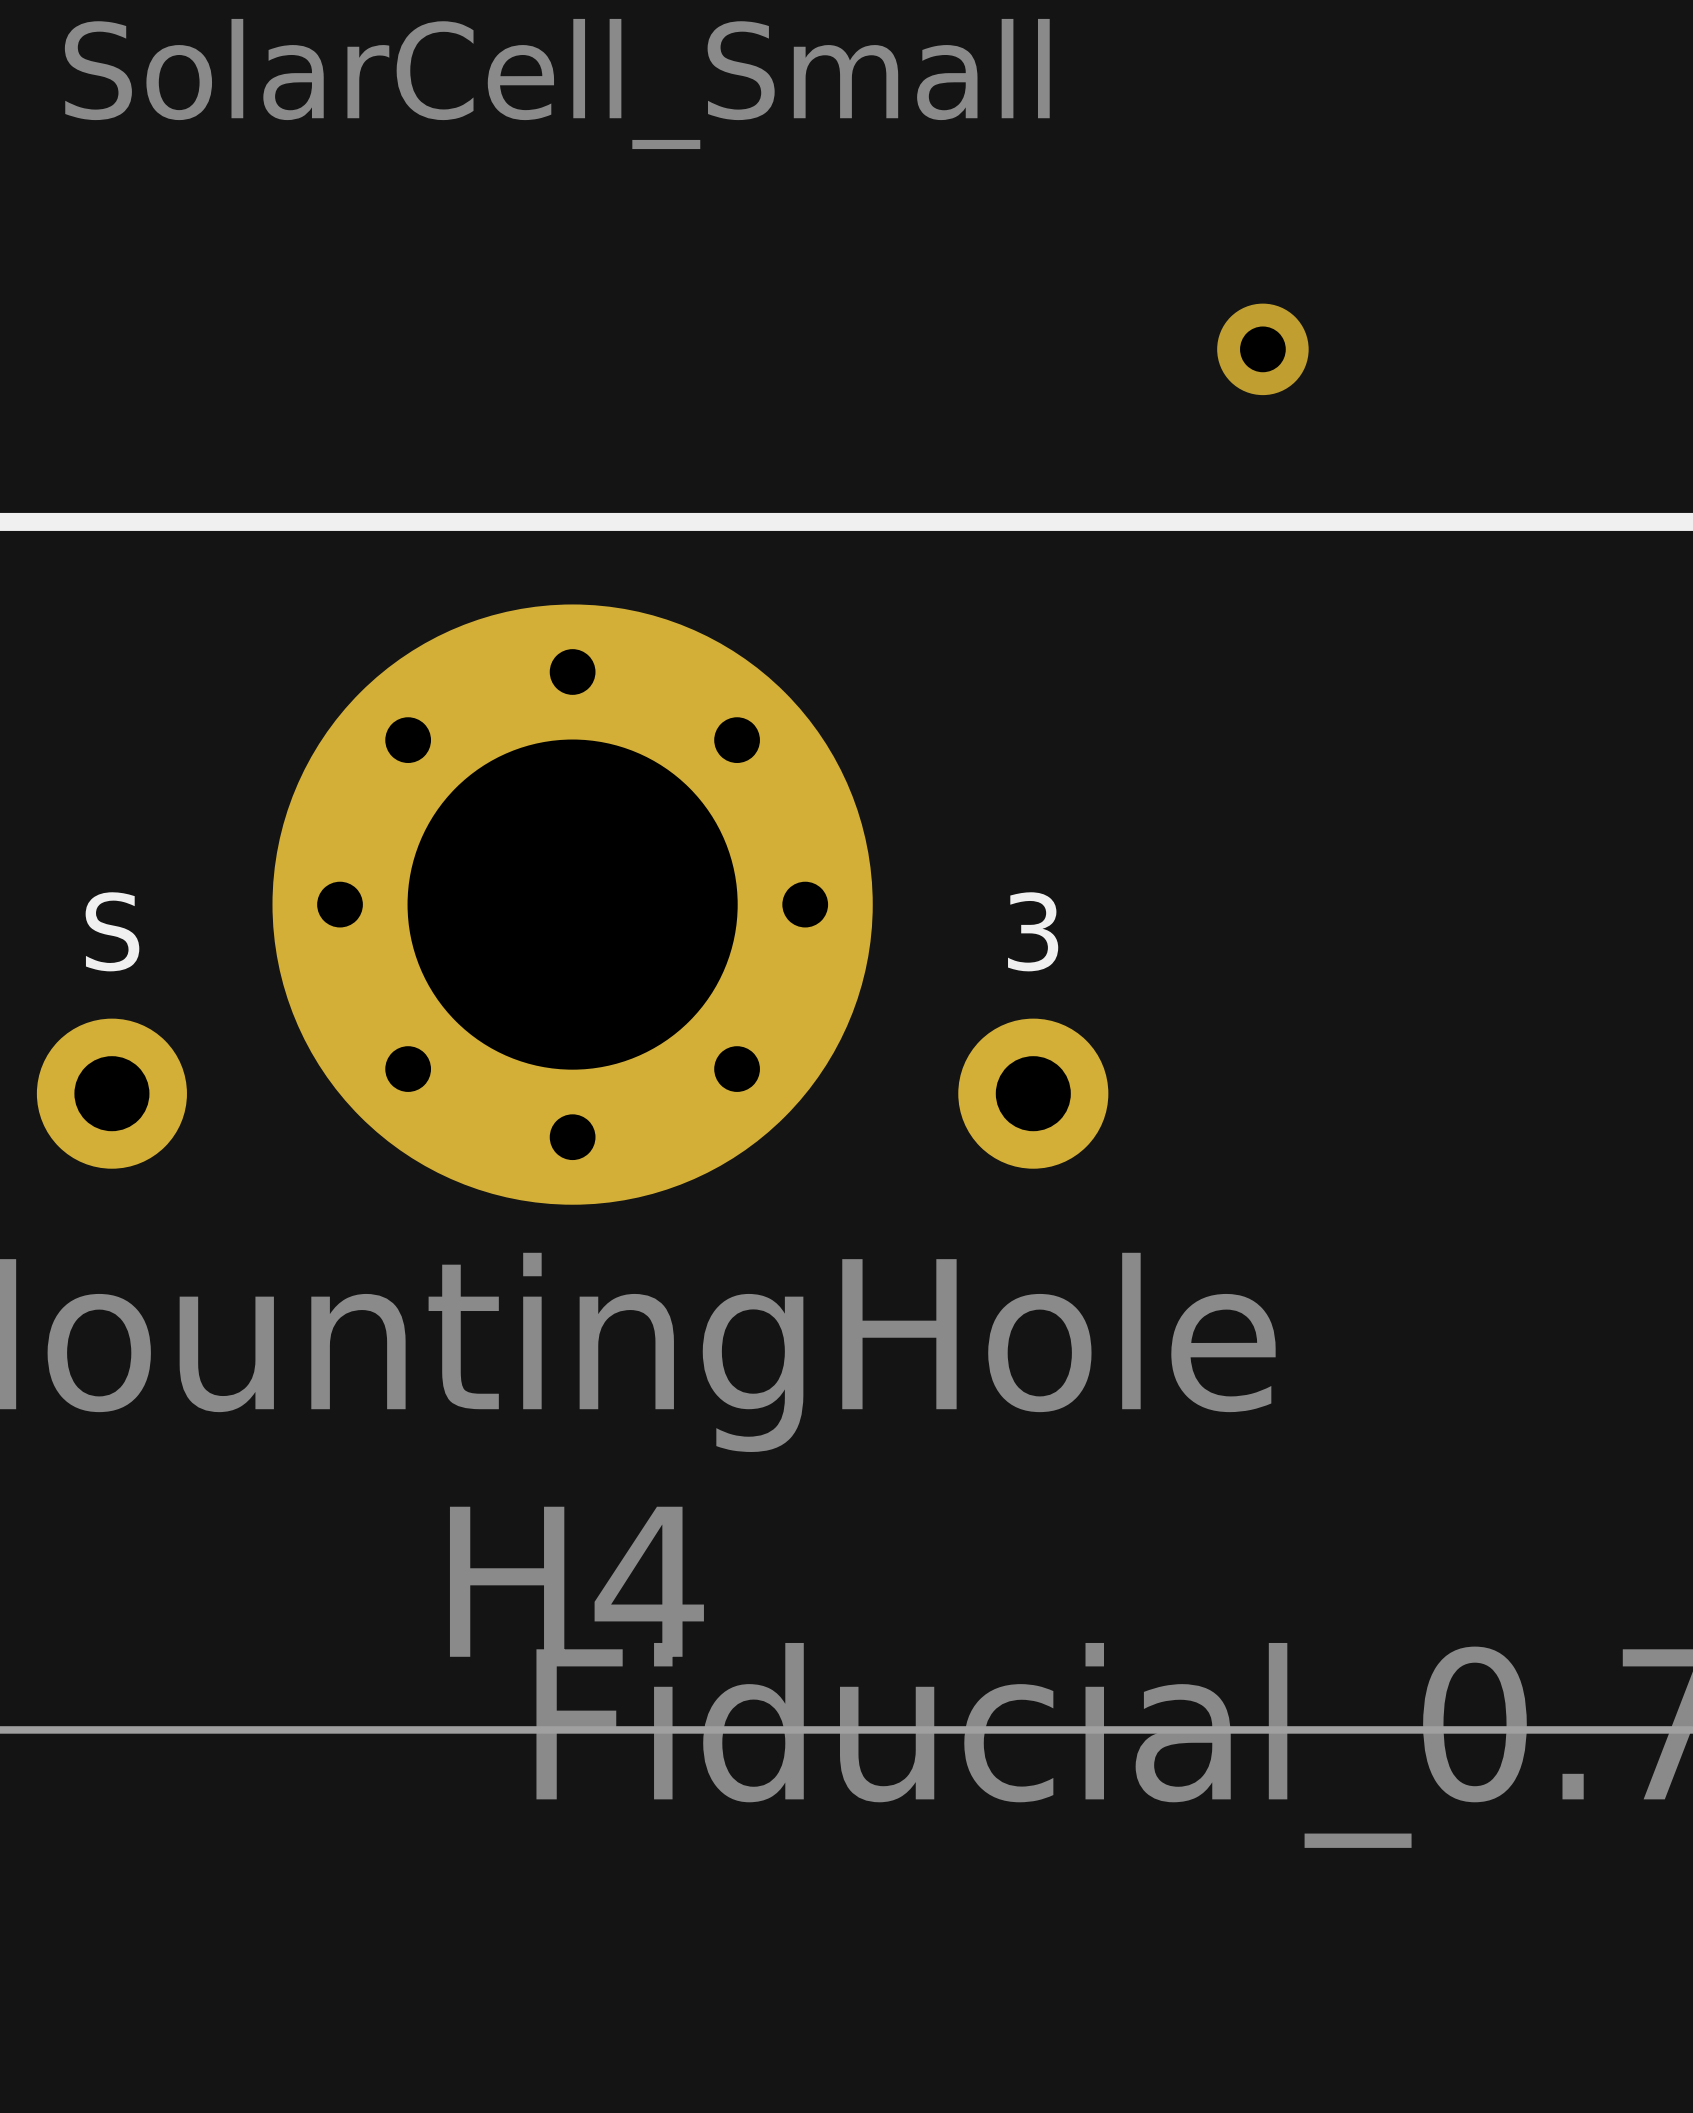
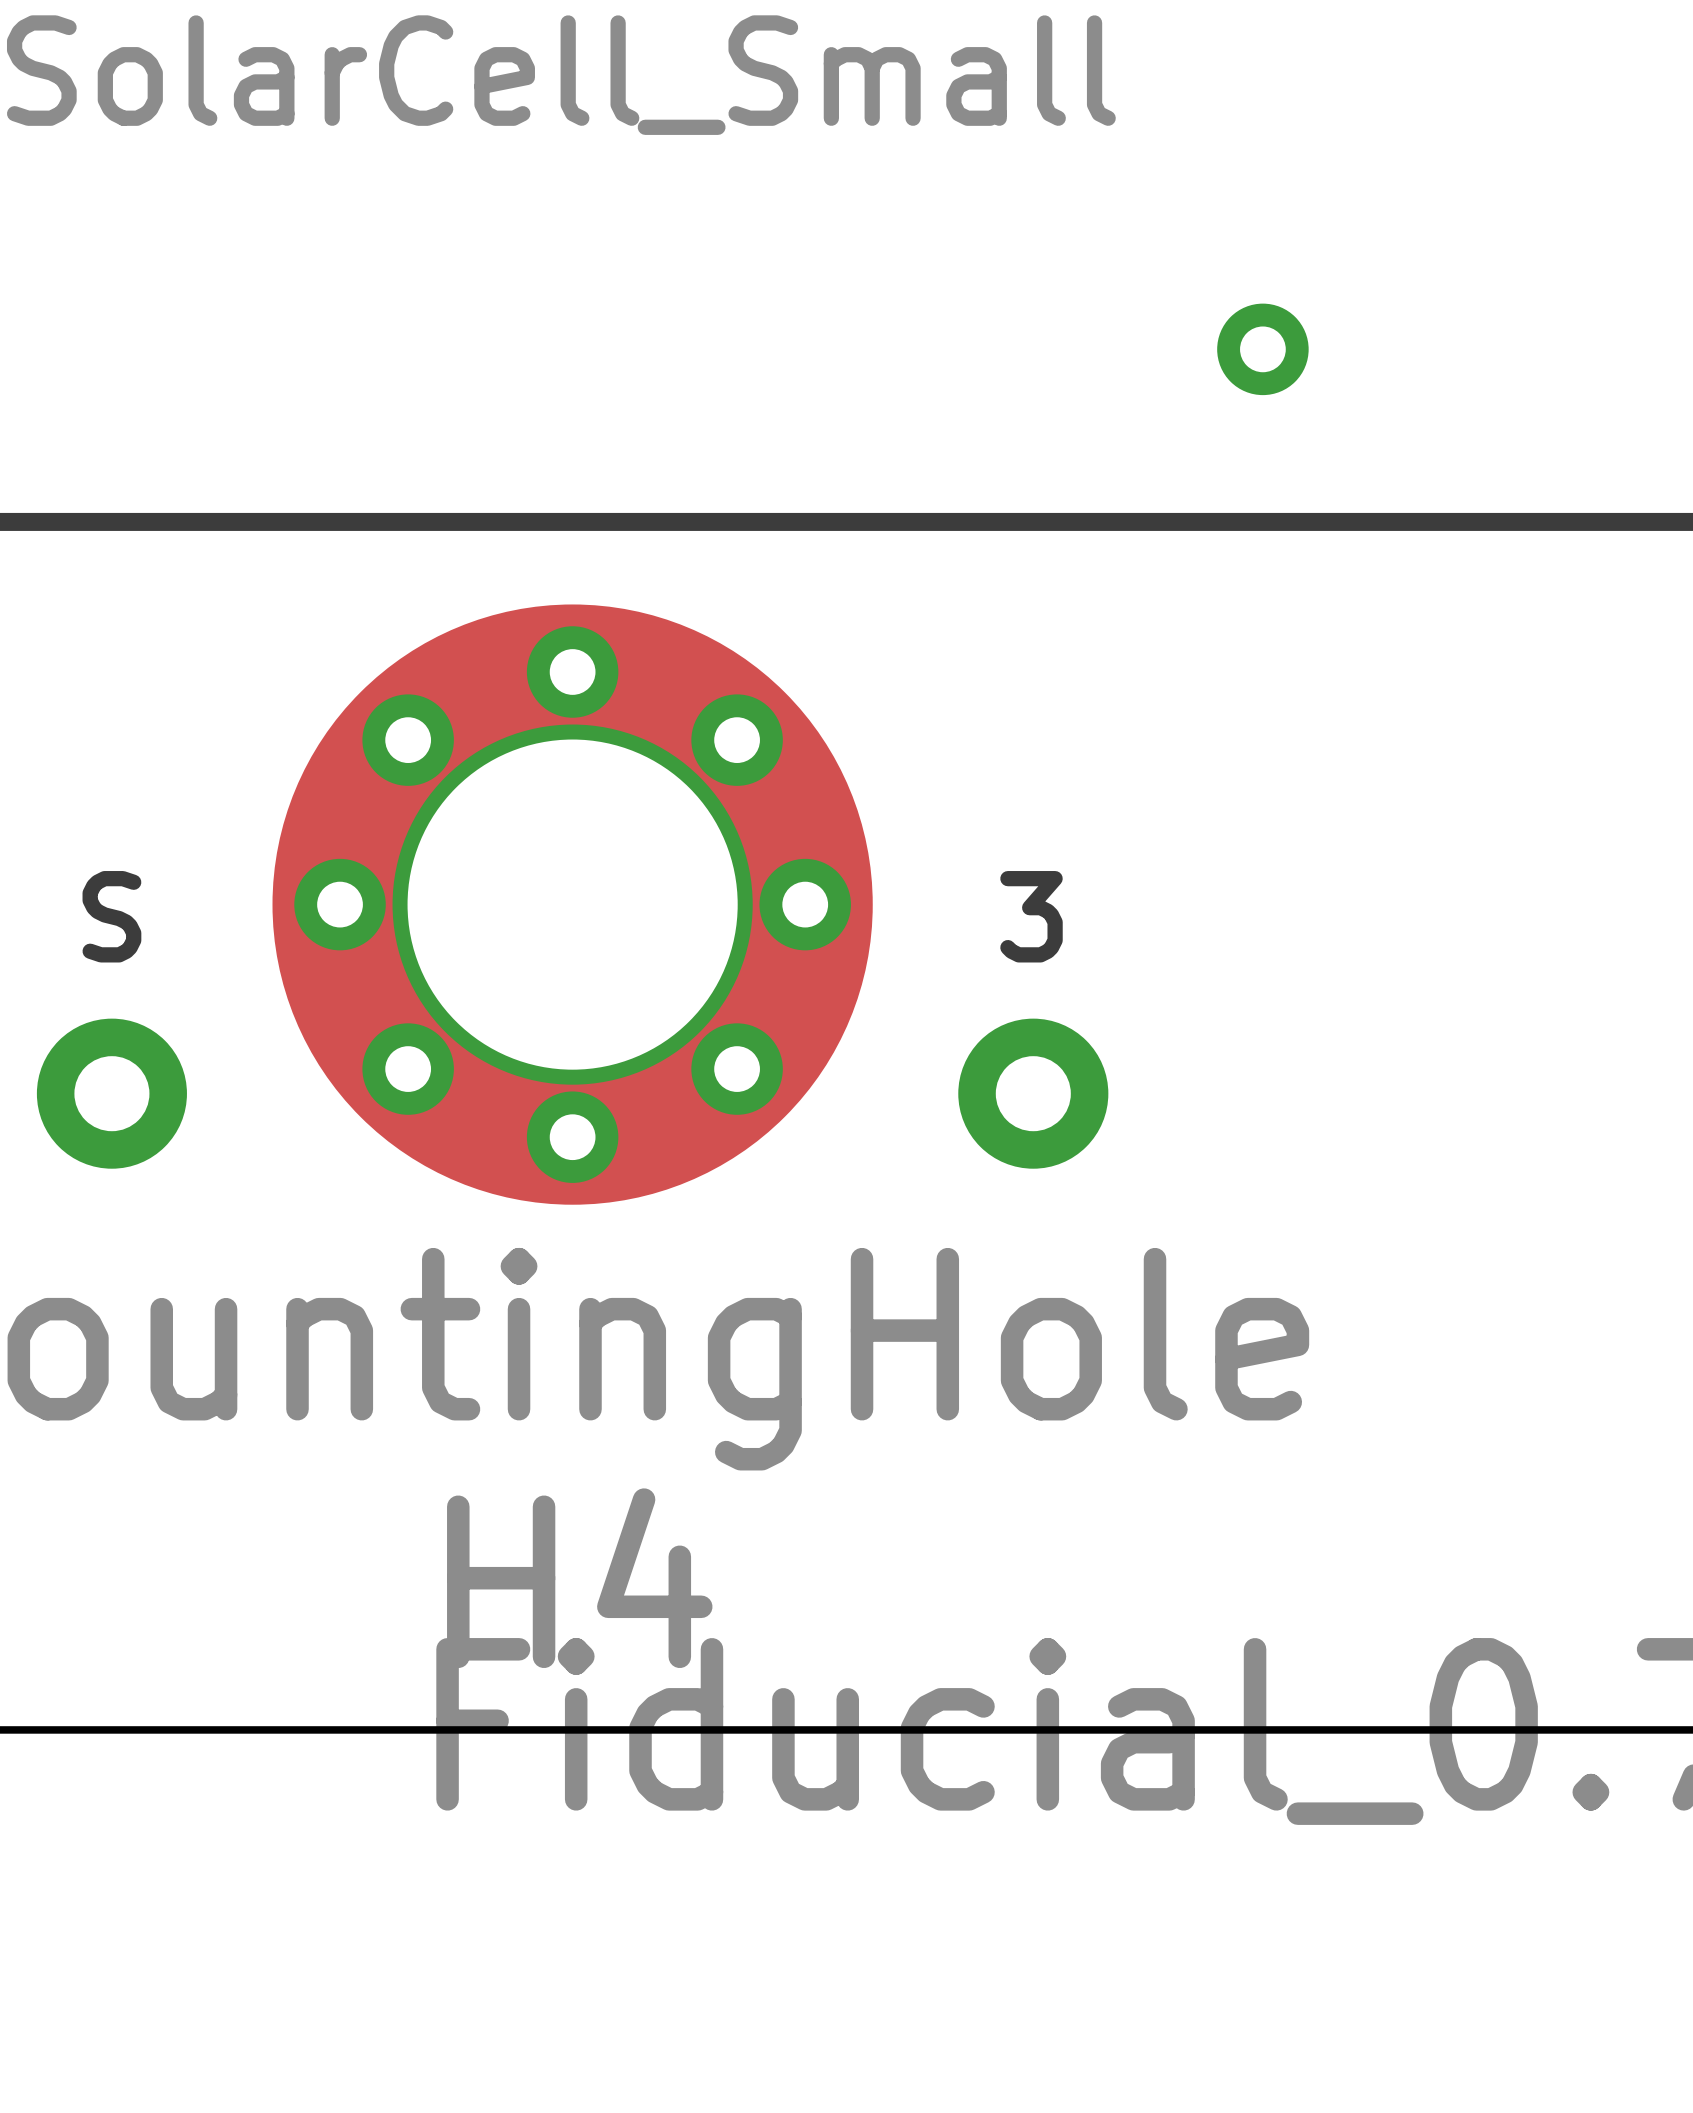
text position: S (112, 931) -> S (111, 916)
text position: 3 (1033, 931) -> 3 (1031, 916)

